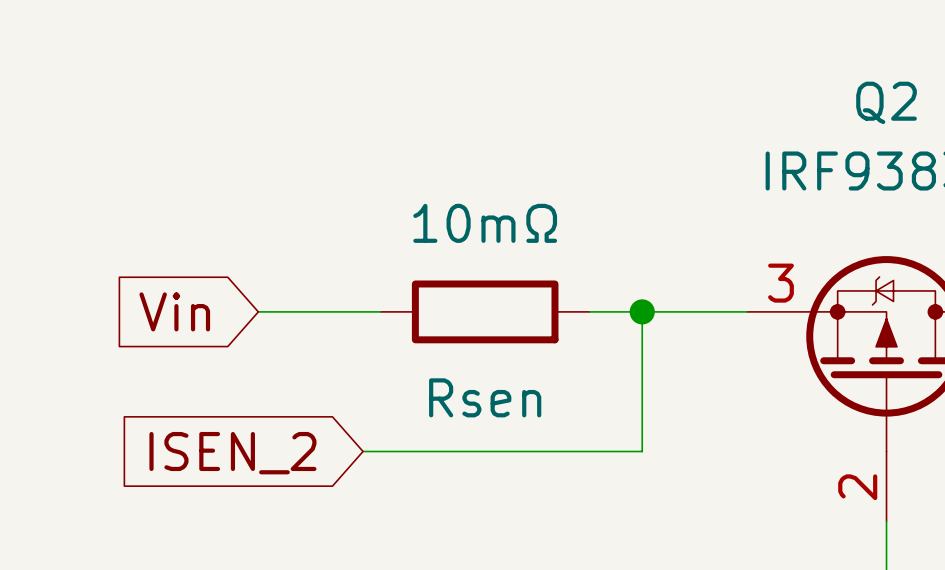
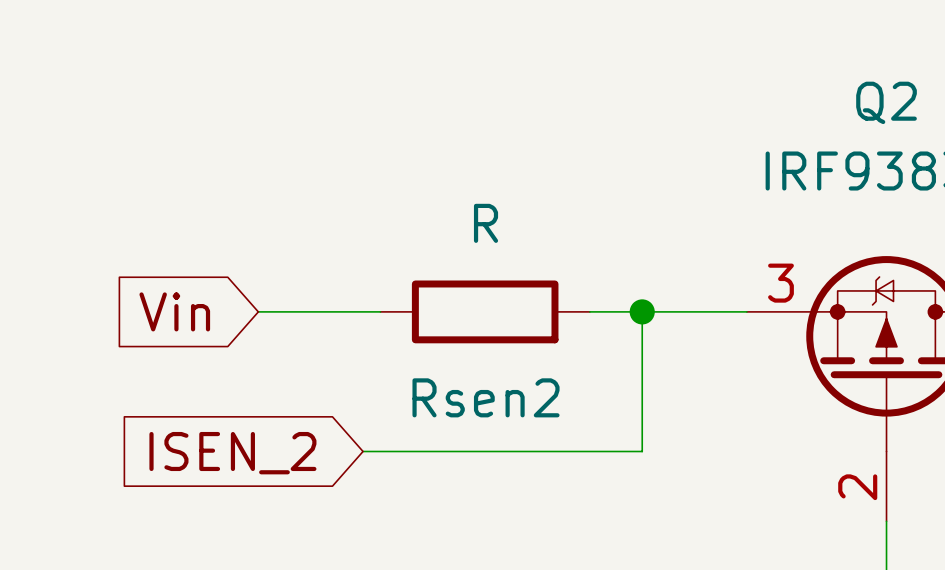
Rsen value: 10mΩ (485, 223) -> R (486, 223)
Rsen name: Rsen (485, 397) -> Rsen2 (486, 397)

